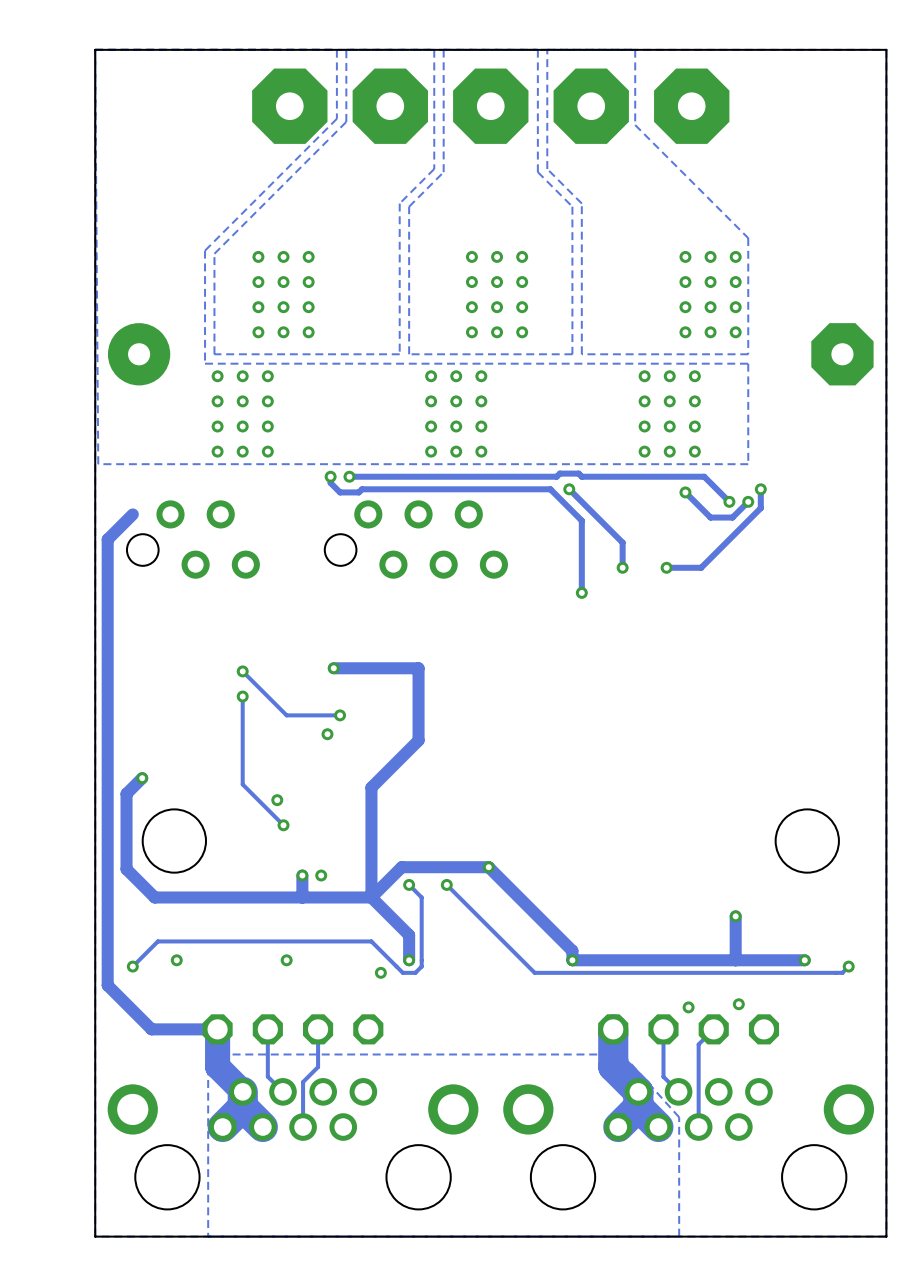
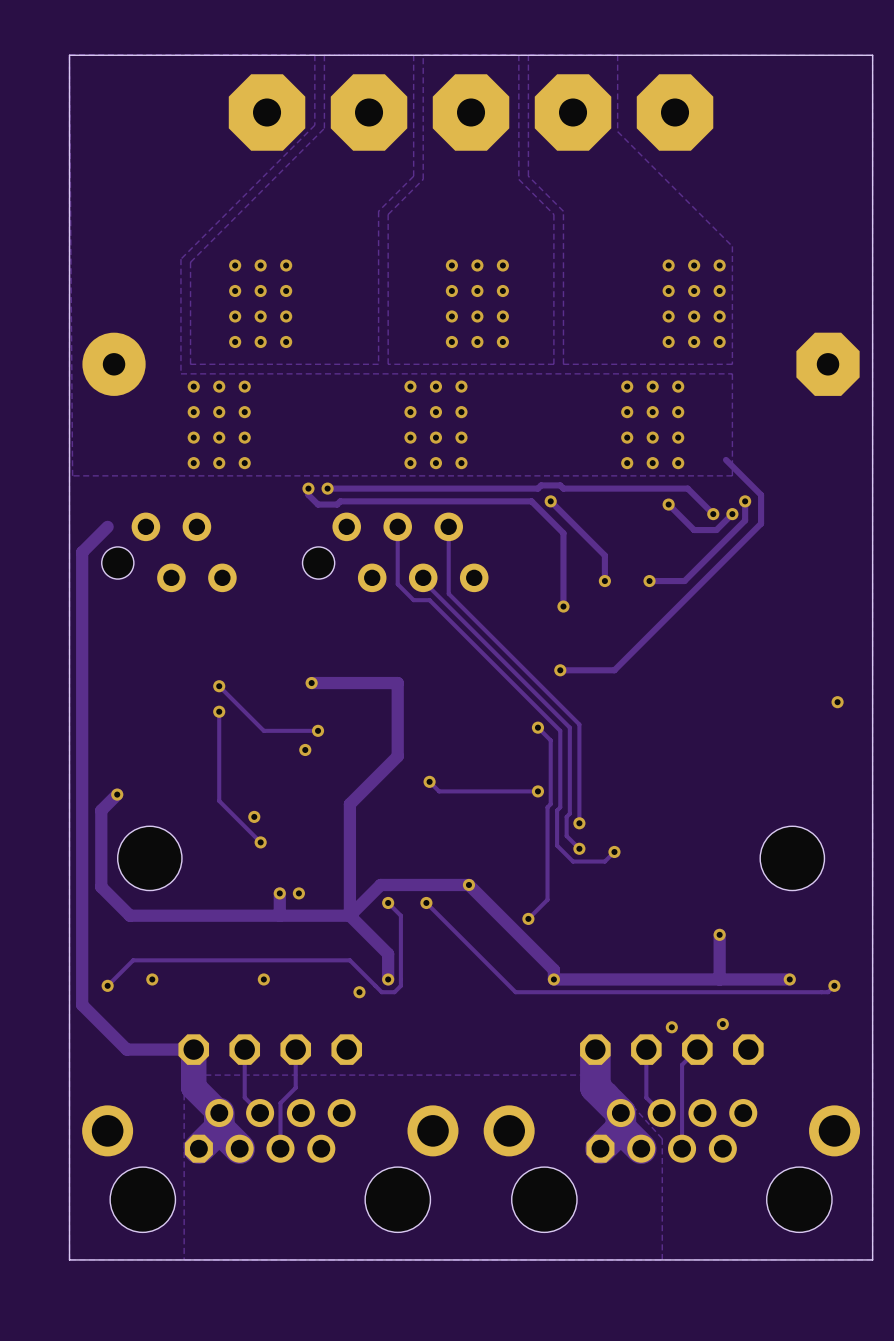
track: none -> (726, 459) (761, 494) (761, 523) (614, 670) (560, 670)
track: none -> (397, 526) (397, 584) (413, 600) (429, 600) (560, 730) (560, 807) (557, 810) (557, 845) (573, 861) (604, 861) (614, 851)
track: none -> (448, 526) (448, 593) (579, 724) (579, 823)
track: none -> (423, 577) (423, 581) (569, 727) (569, 813) (566, 816) (566, 836) (579, 848)
via: none -> (560, 670)
via: none -> (837, 702)
track: none -> (537, 727) (550, 740) (550, 804) (547, 807) (547, 899) (528, 918)
via: none -> (537, 727)
track: none -> (429, 781) (439, 791) (537, 791)
via: none -> (429, 781)
via: none -> (537, 791)
via: none -> (579, 823)
via: none -> (579, 848)
via: none -> (614, 851)
via: none -> (528, 918)

